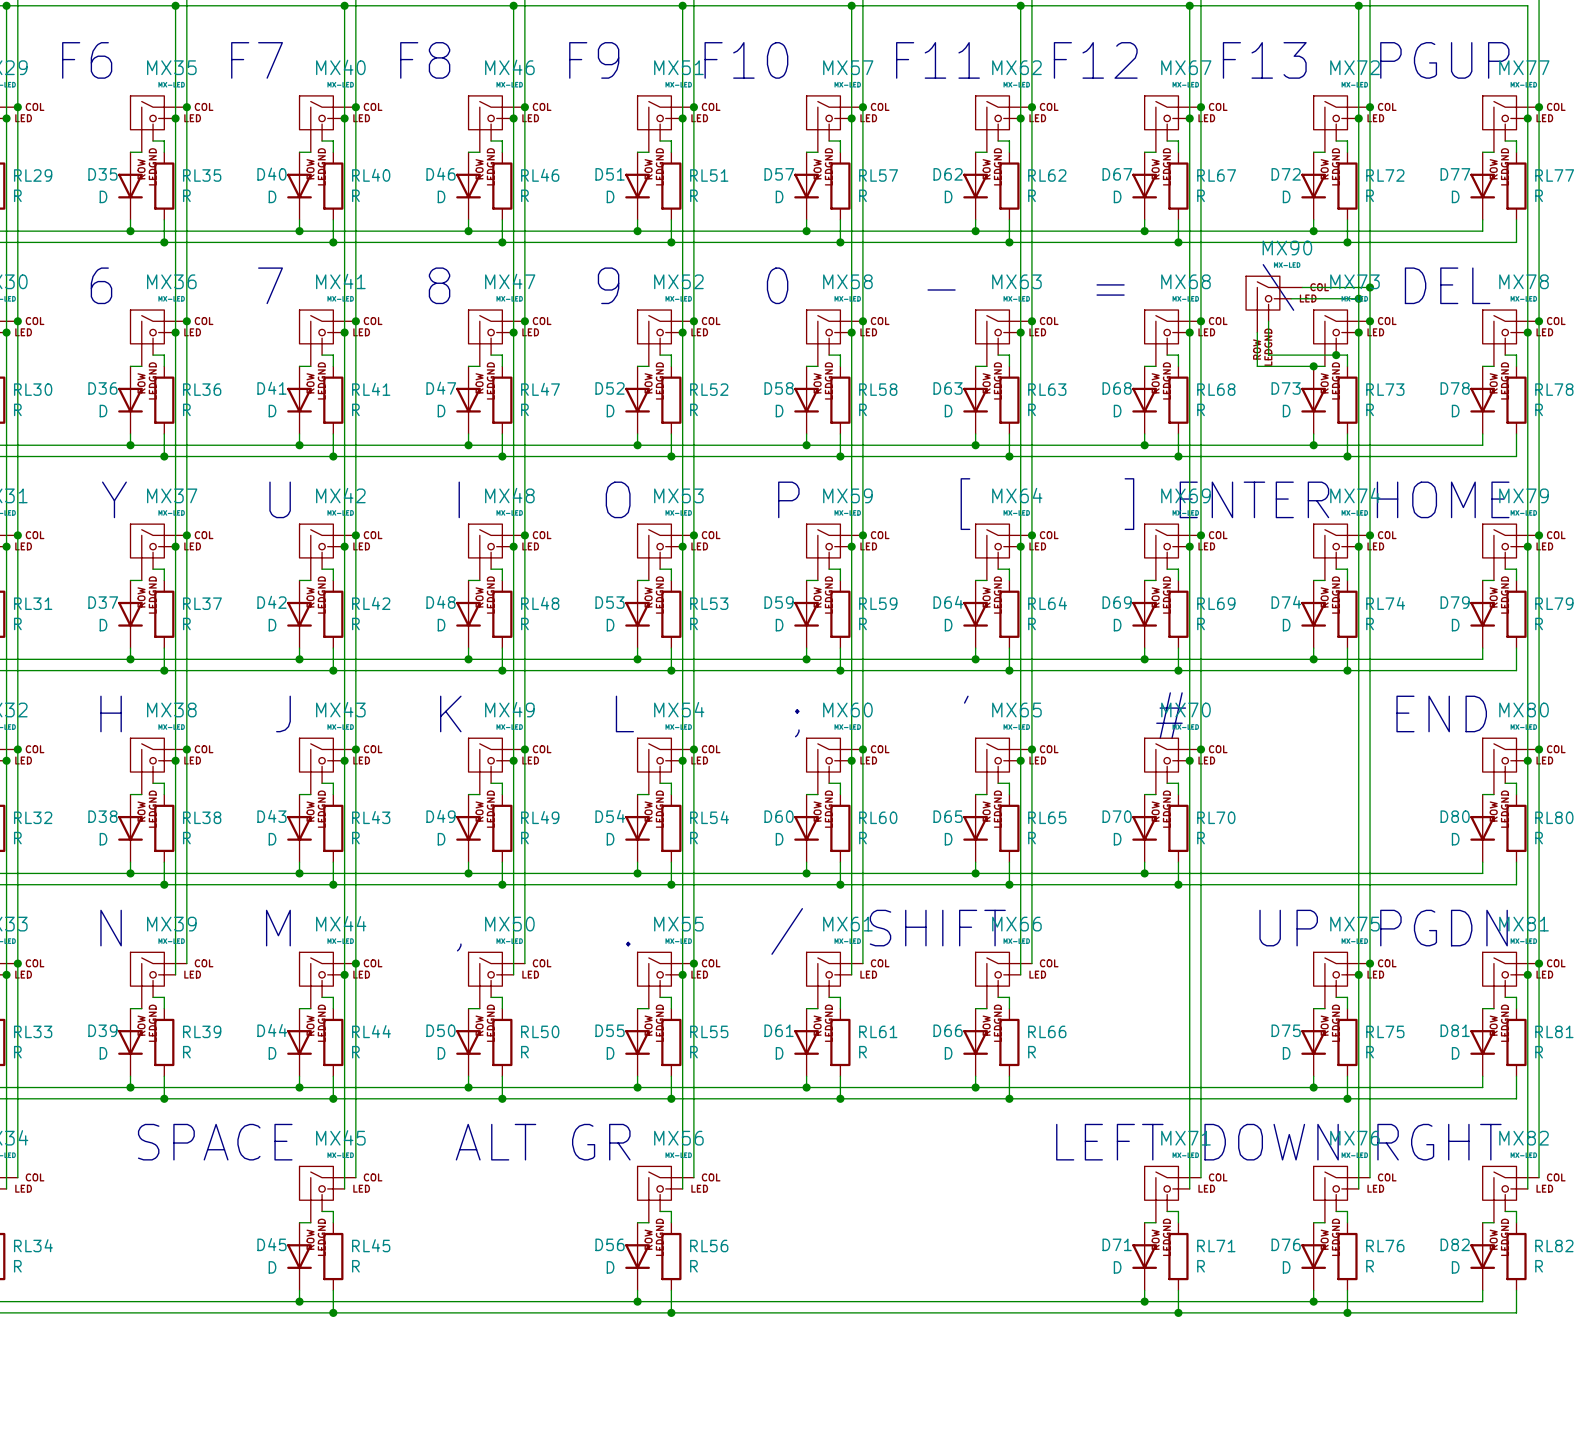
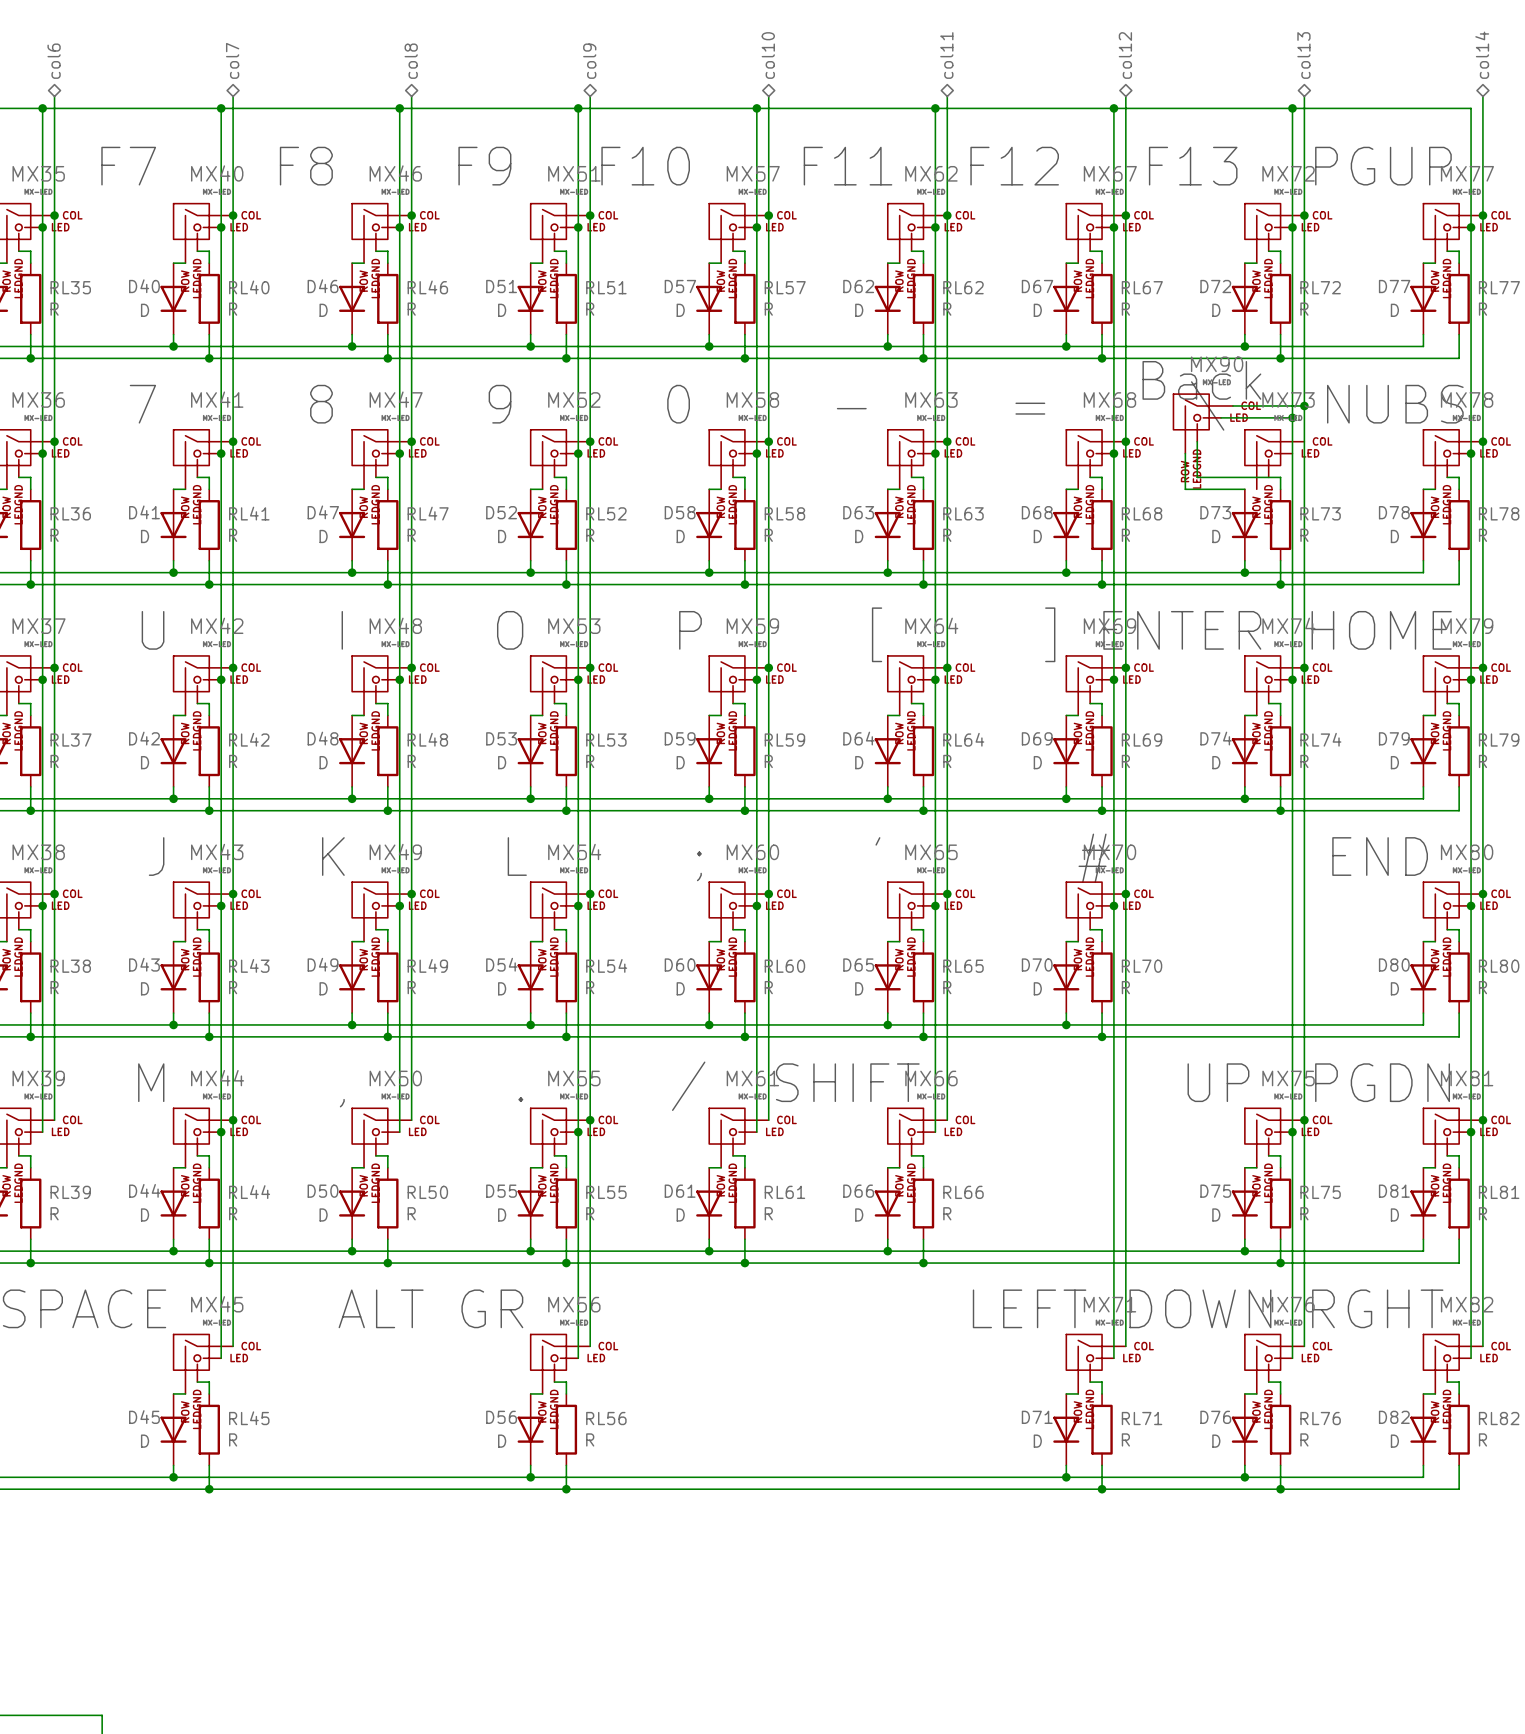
text: none -> Back (1201, 380)
text: DEL (1447, 285) -> none
text: none -> NUBS (1395, 404)
junction: (1370, 321) -> none
junction: (1358, 332) -> none
junction: (1336, 355) -> none
wire: (1313, 366) (1324, 366) -> none
junction: (1313, 366) -> none

